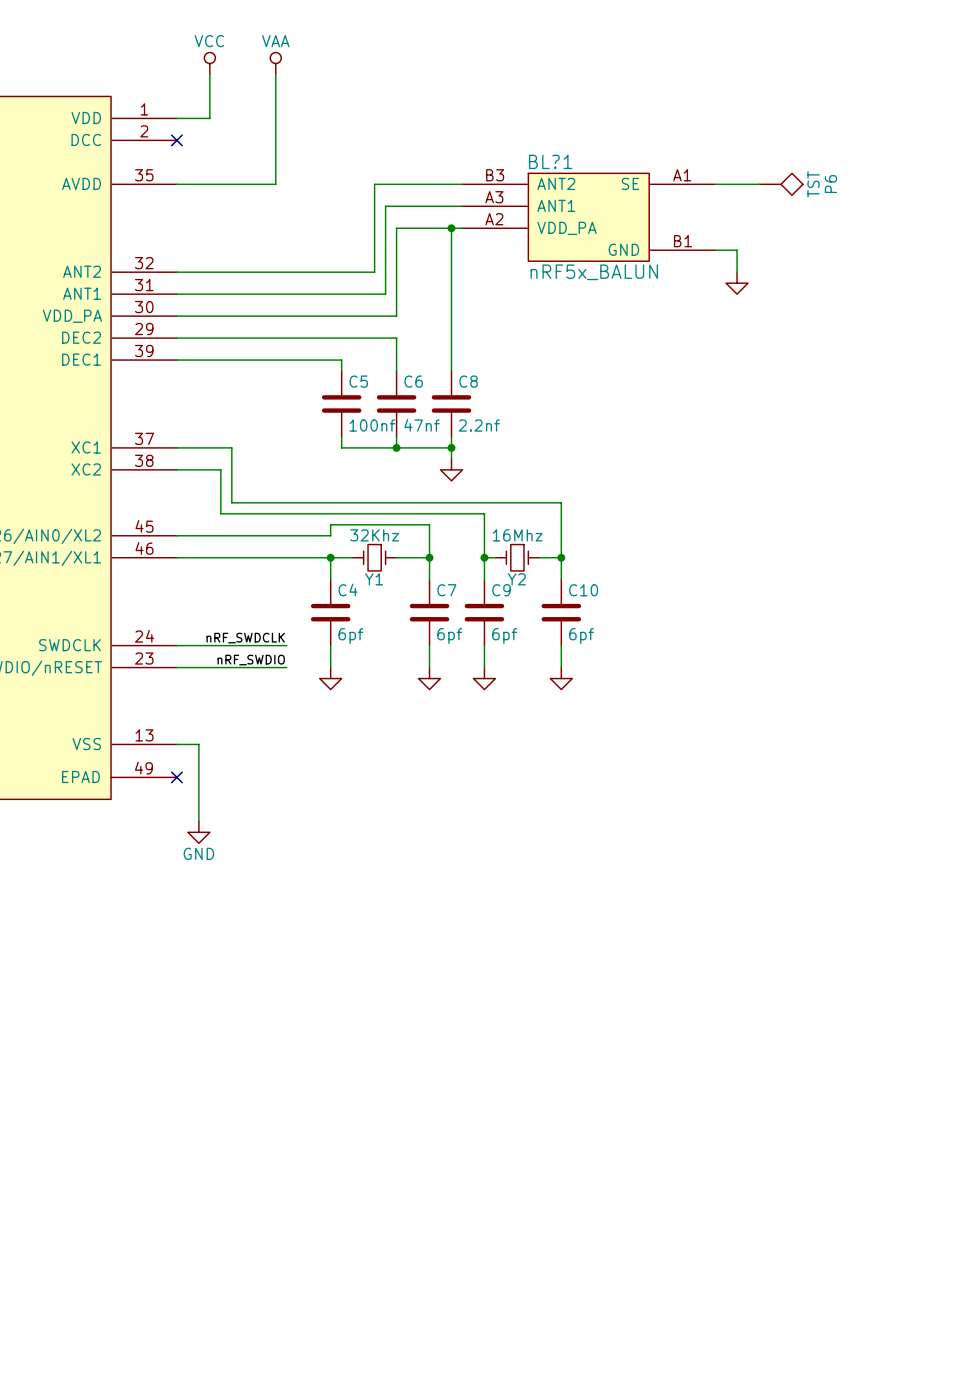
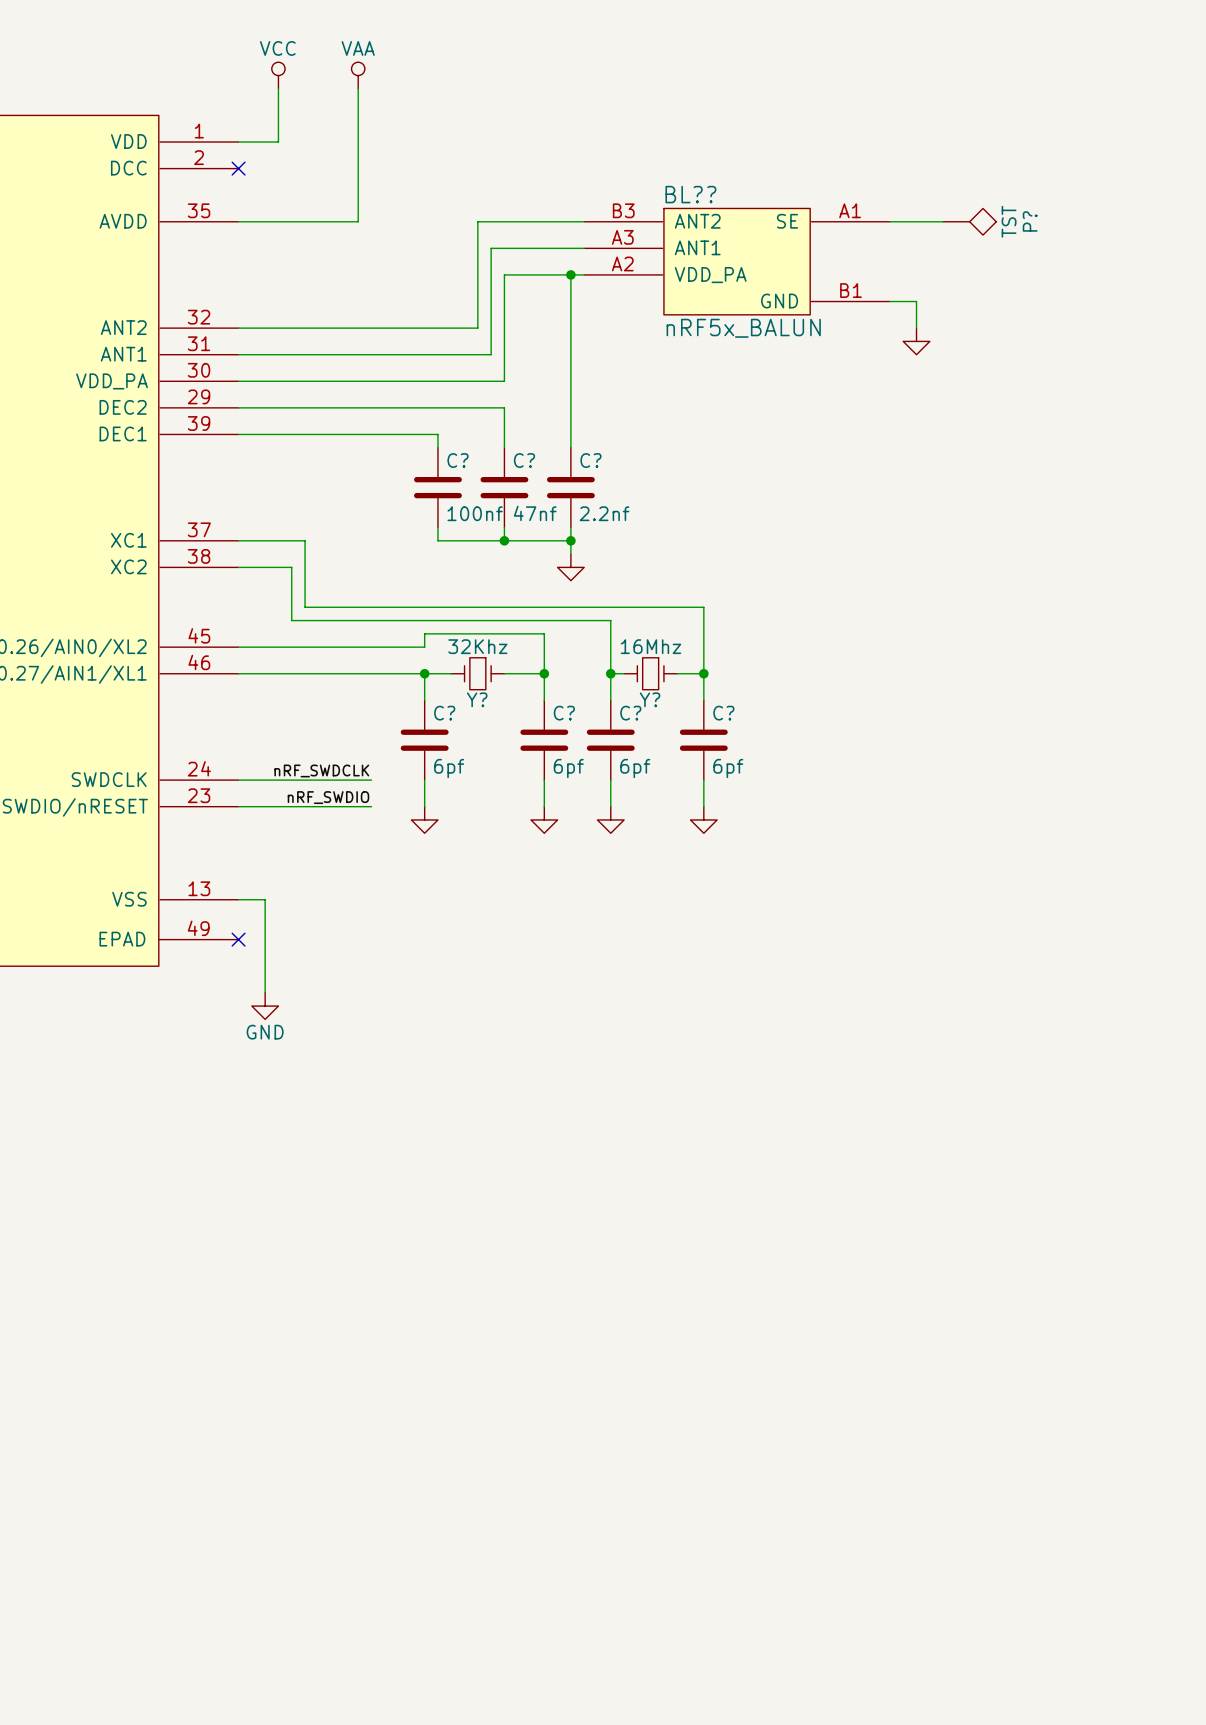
BL?1 name: BL?1 (550, 161) -> BL?? (690, 194)
P6 name: P6 (830, 184) -> P? (1030, 221)
C5 name: C5 (358, 381) -> C? (458, 460)
C6 name: C6 (413, 381) -> C? (524, 460)
C8 name: C8 (468, 381) -> C? (590, 460)
Y1 name: Y1 (374, 579) -> Y? (477, 699)
Y2 name: Y2 (516, 579) -> Y? (650, 699)
C4 name: C4 (348, 590) -> C? (444, 713)
C7 name: C7 (446, 590) -> C? (564, 713)
C9 name: C9 (501, 590) -> C? (630, 713)
C10 name: C10 (583, 590) -> C? (723, 713)

